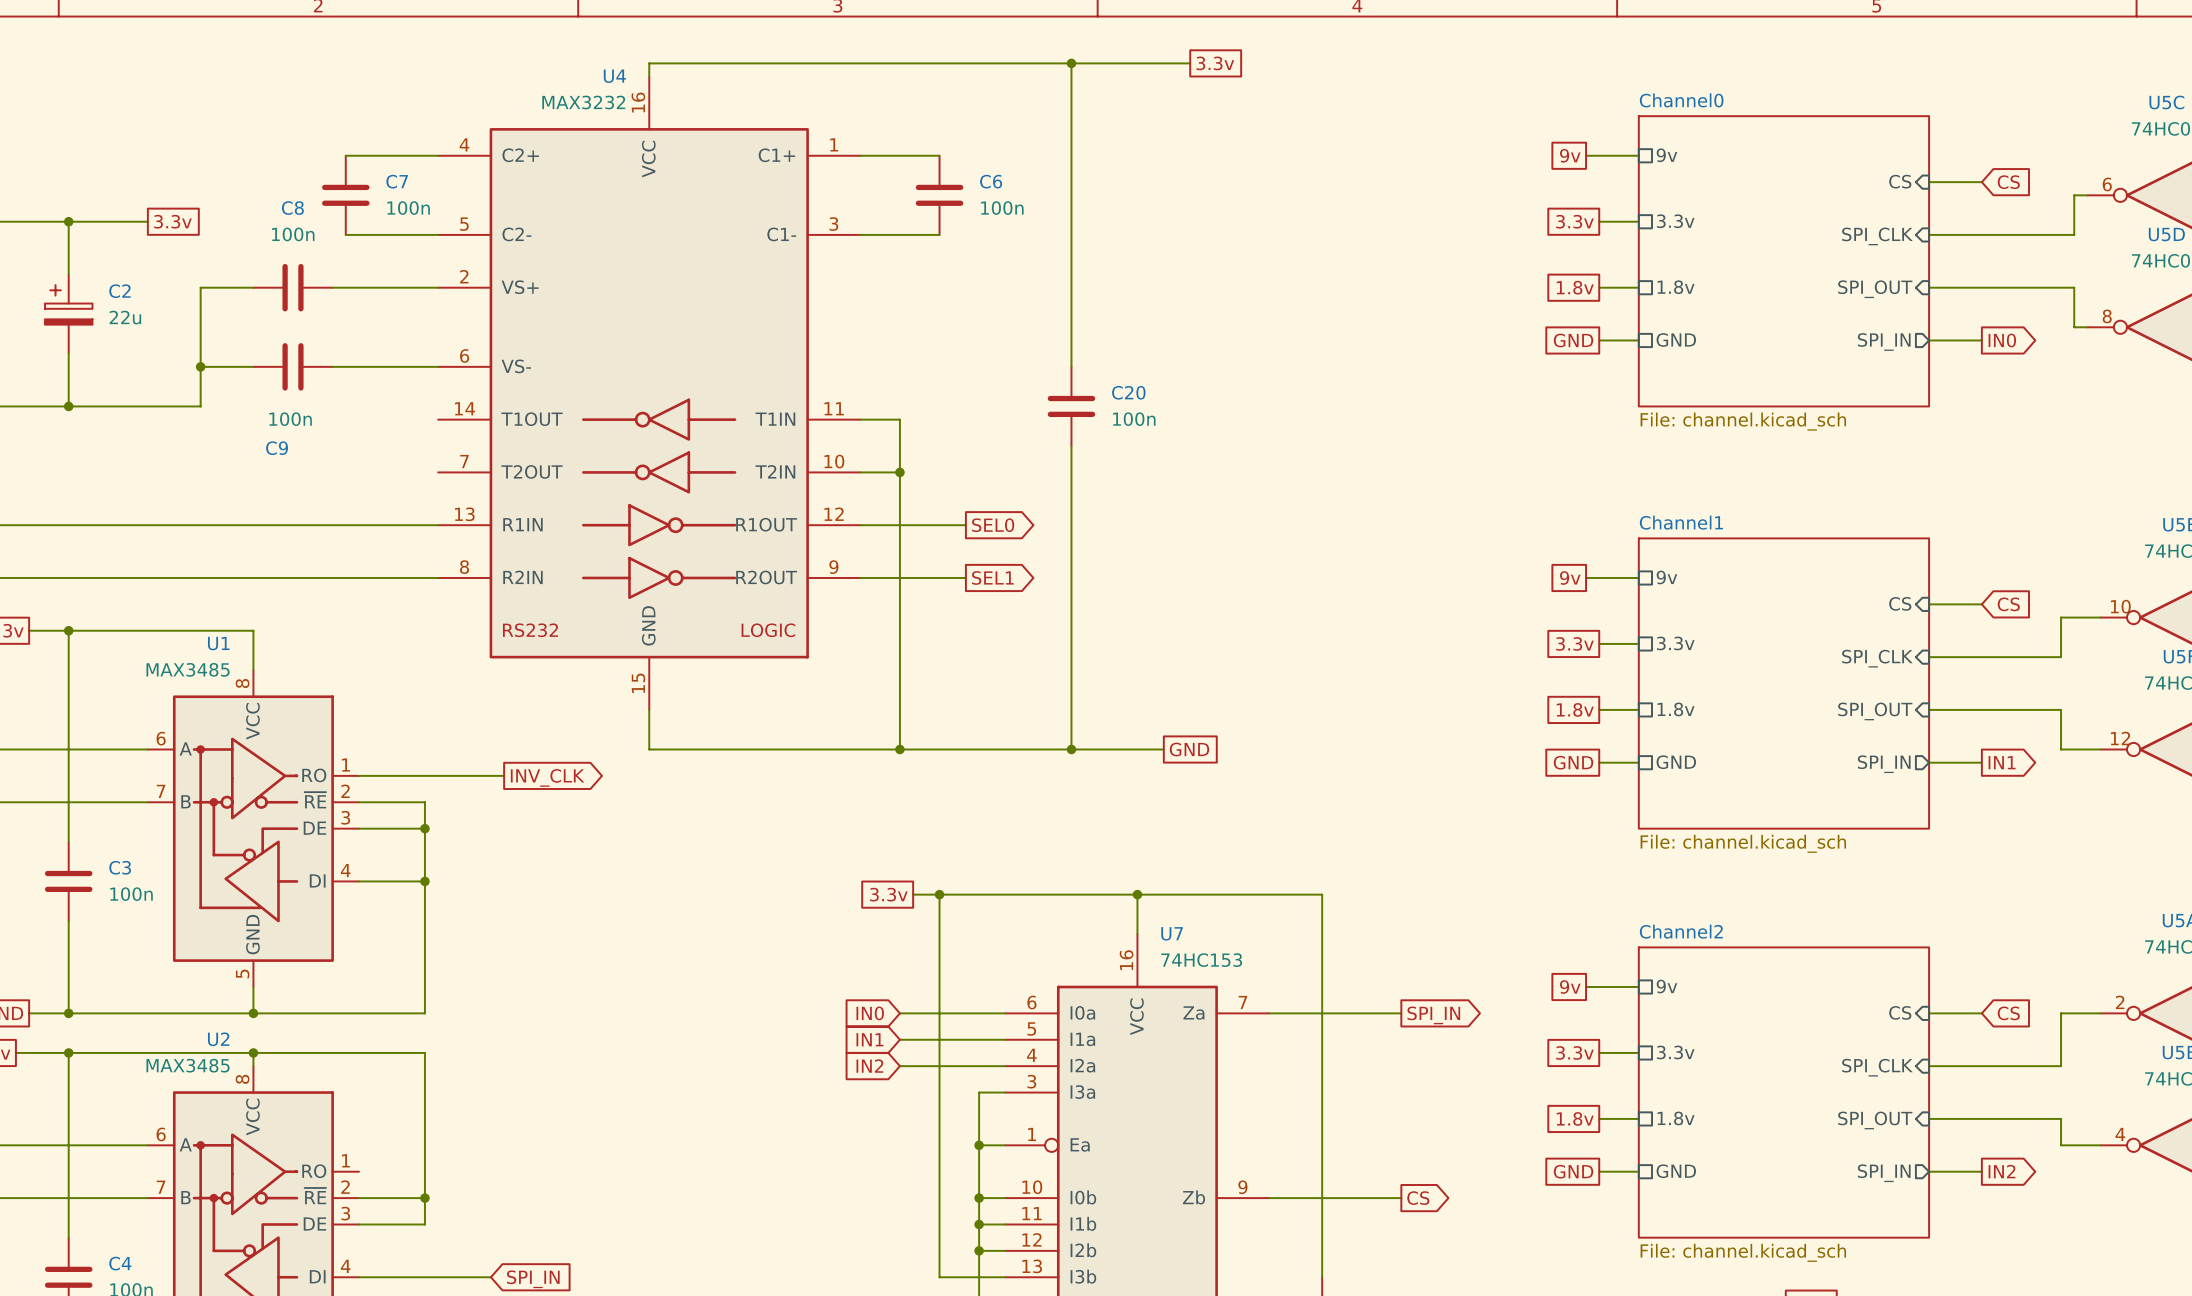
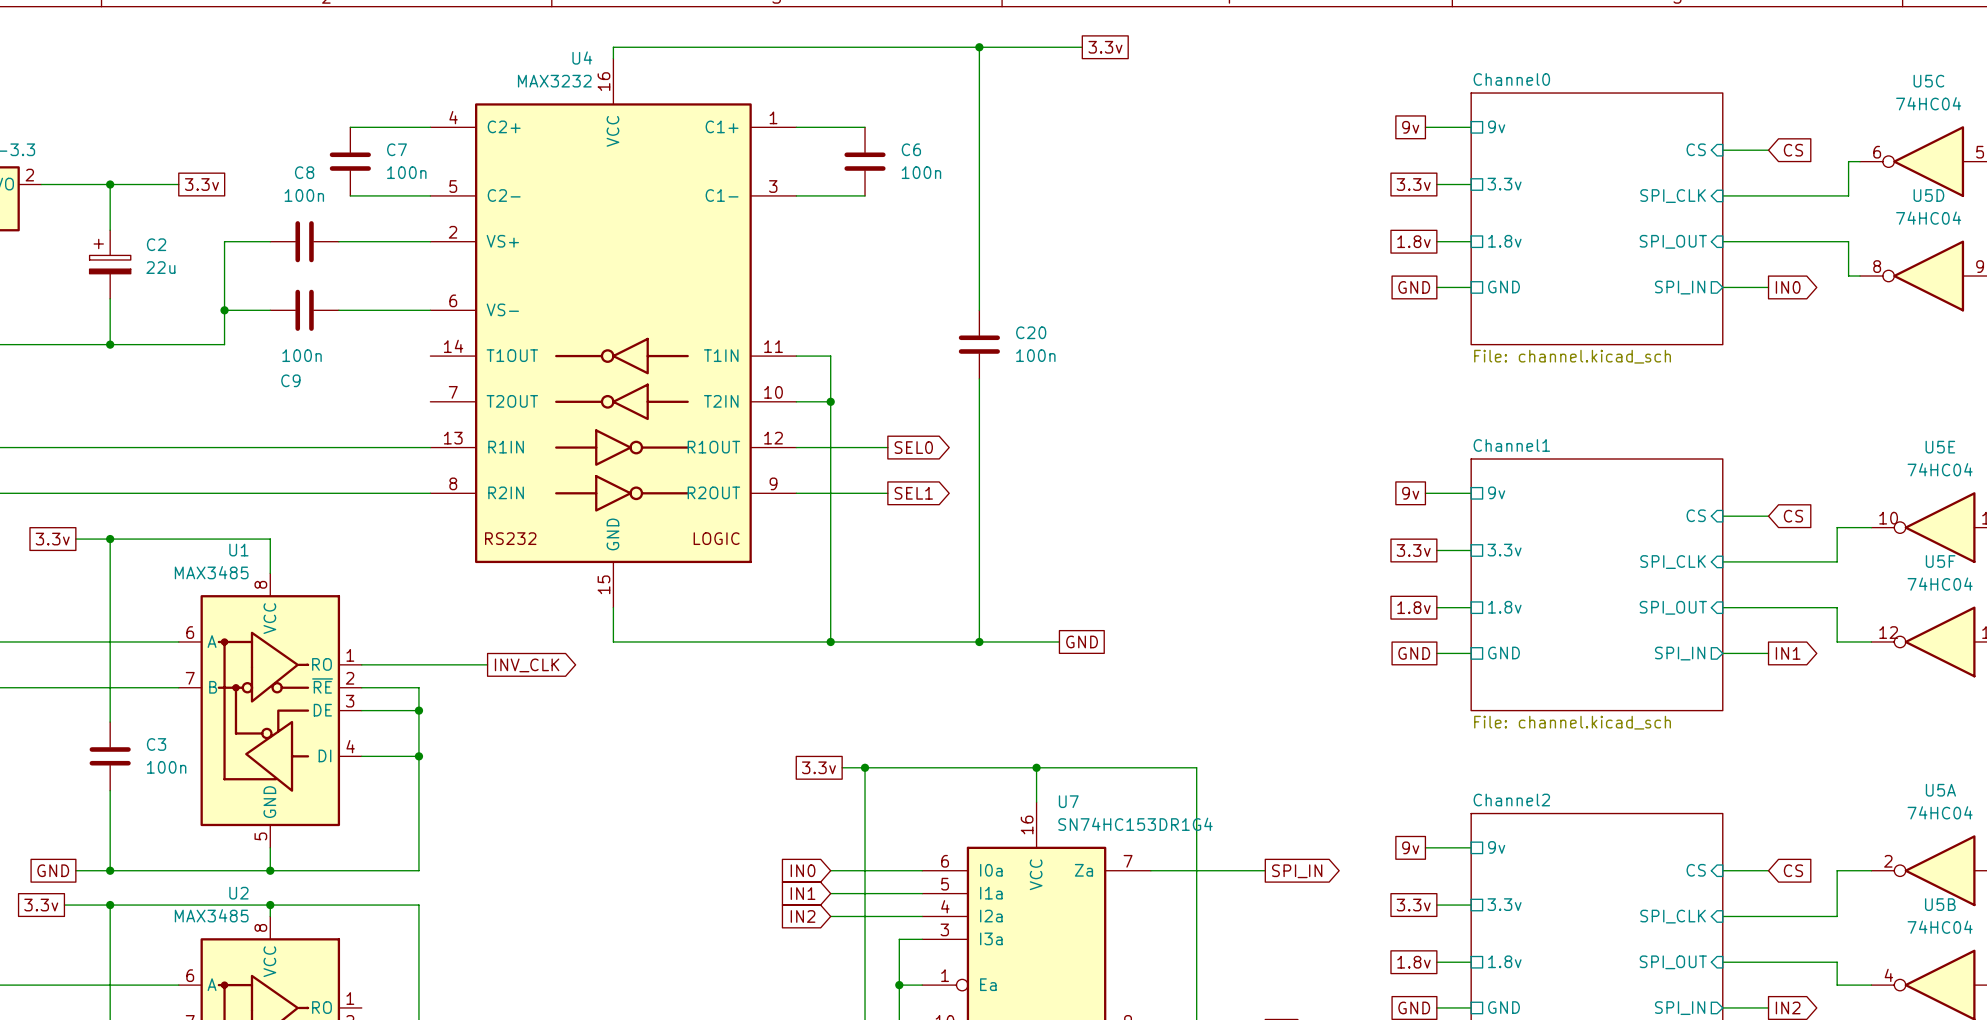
U7 value: 74HC153 (1201, 960) -> SN74HC153DR1G4 (1135, 824)

